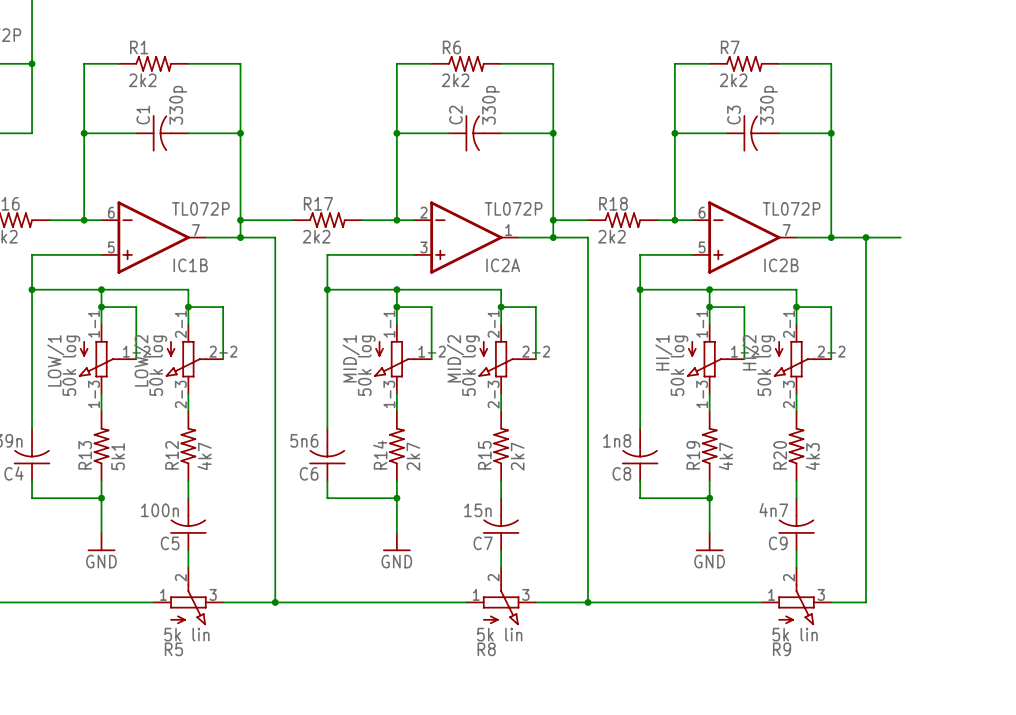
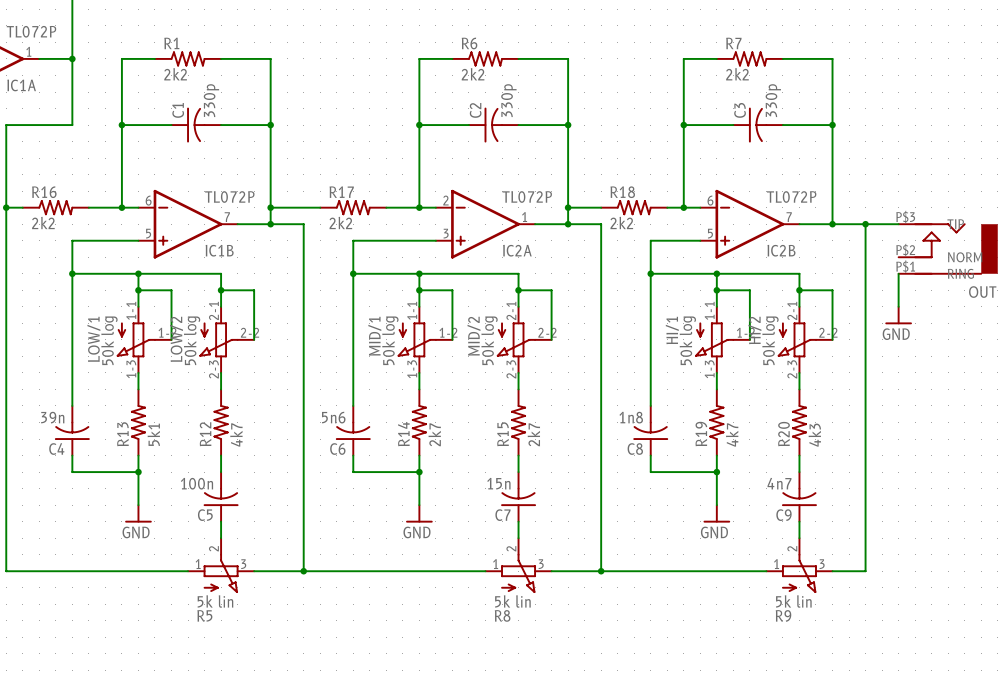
OUT: none -> (948, 248)
wire: none -> (898, 273) (898, 306)
power symbol: none -> GND (898, 315)

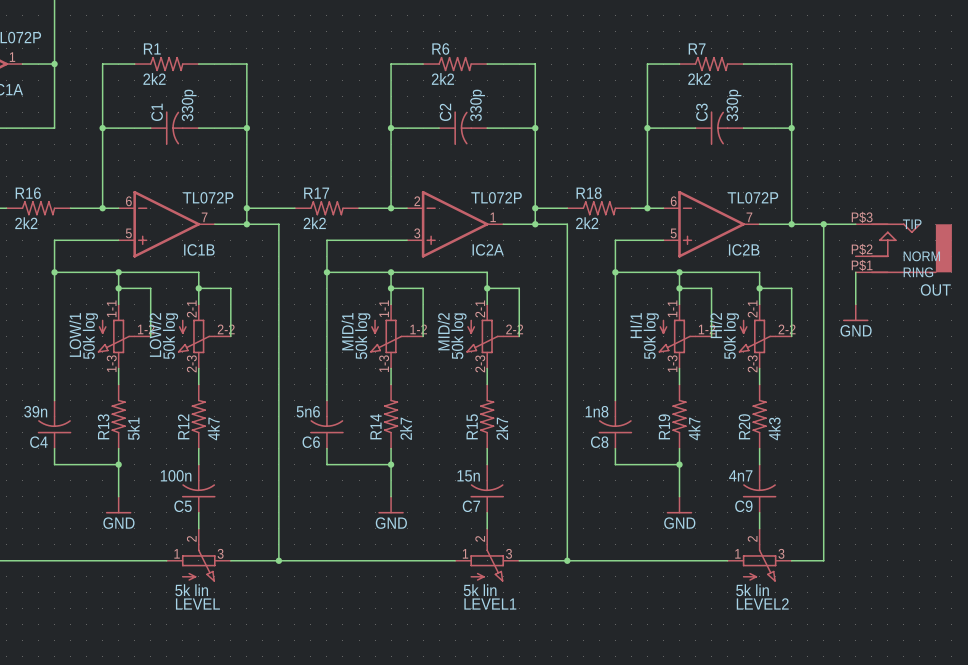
R5 name: R5 (204, 615) -> LEVEL (197, 604)
R8 name: R8 (502, 615) -> LEVEL1 (490, 604)
R9 name: R9 (783, 615) -> LEVEL2 (762, 603)

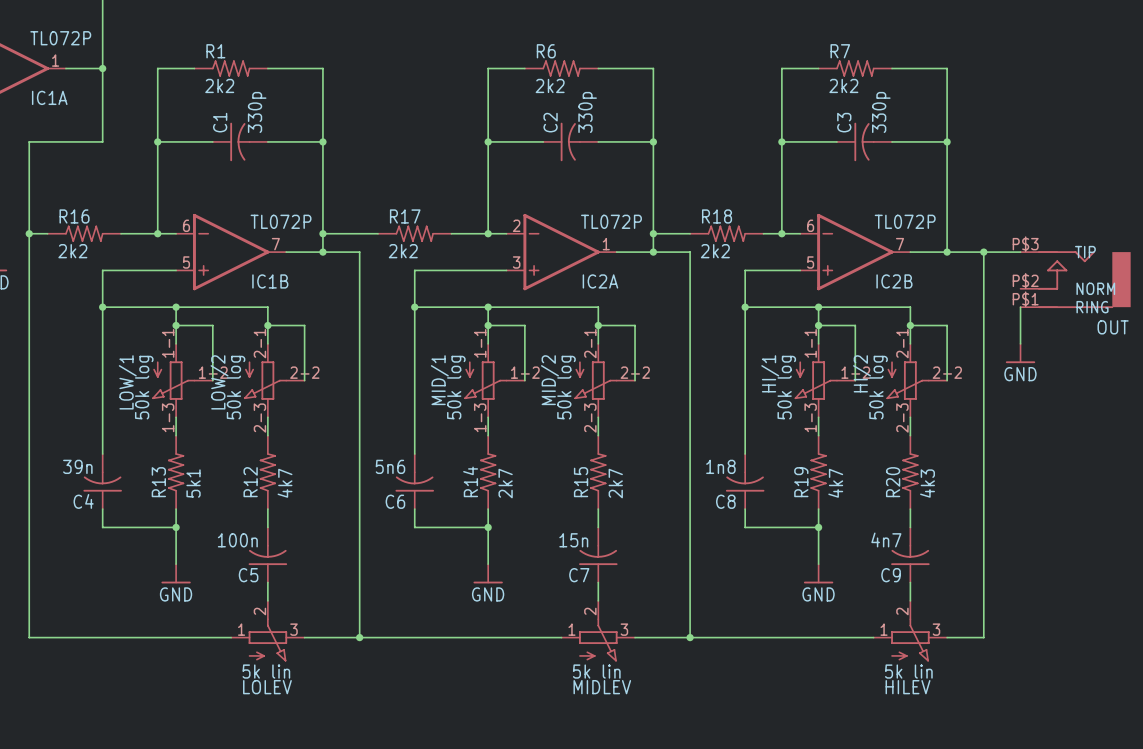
LEVEL2 name: LEVEL2 (762, 603) -> HILEV (908, 687)
LEVEL name: LEVEL (197, 604) -> LOLEV (267, 687)
LEVEL1 name: LEVEL1 (490, 604) -> MIDLEV (602, 687)

